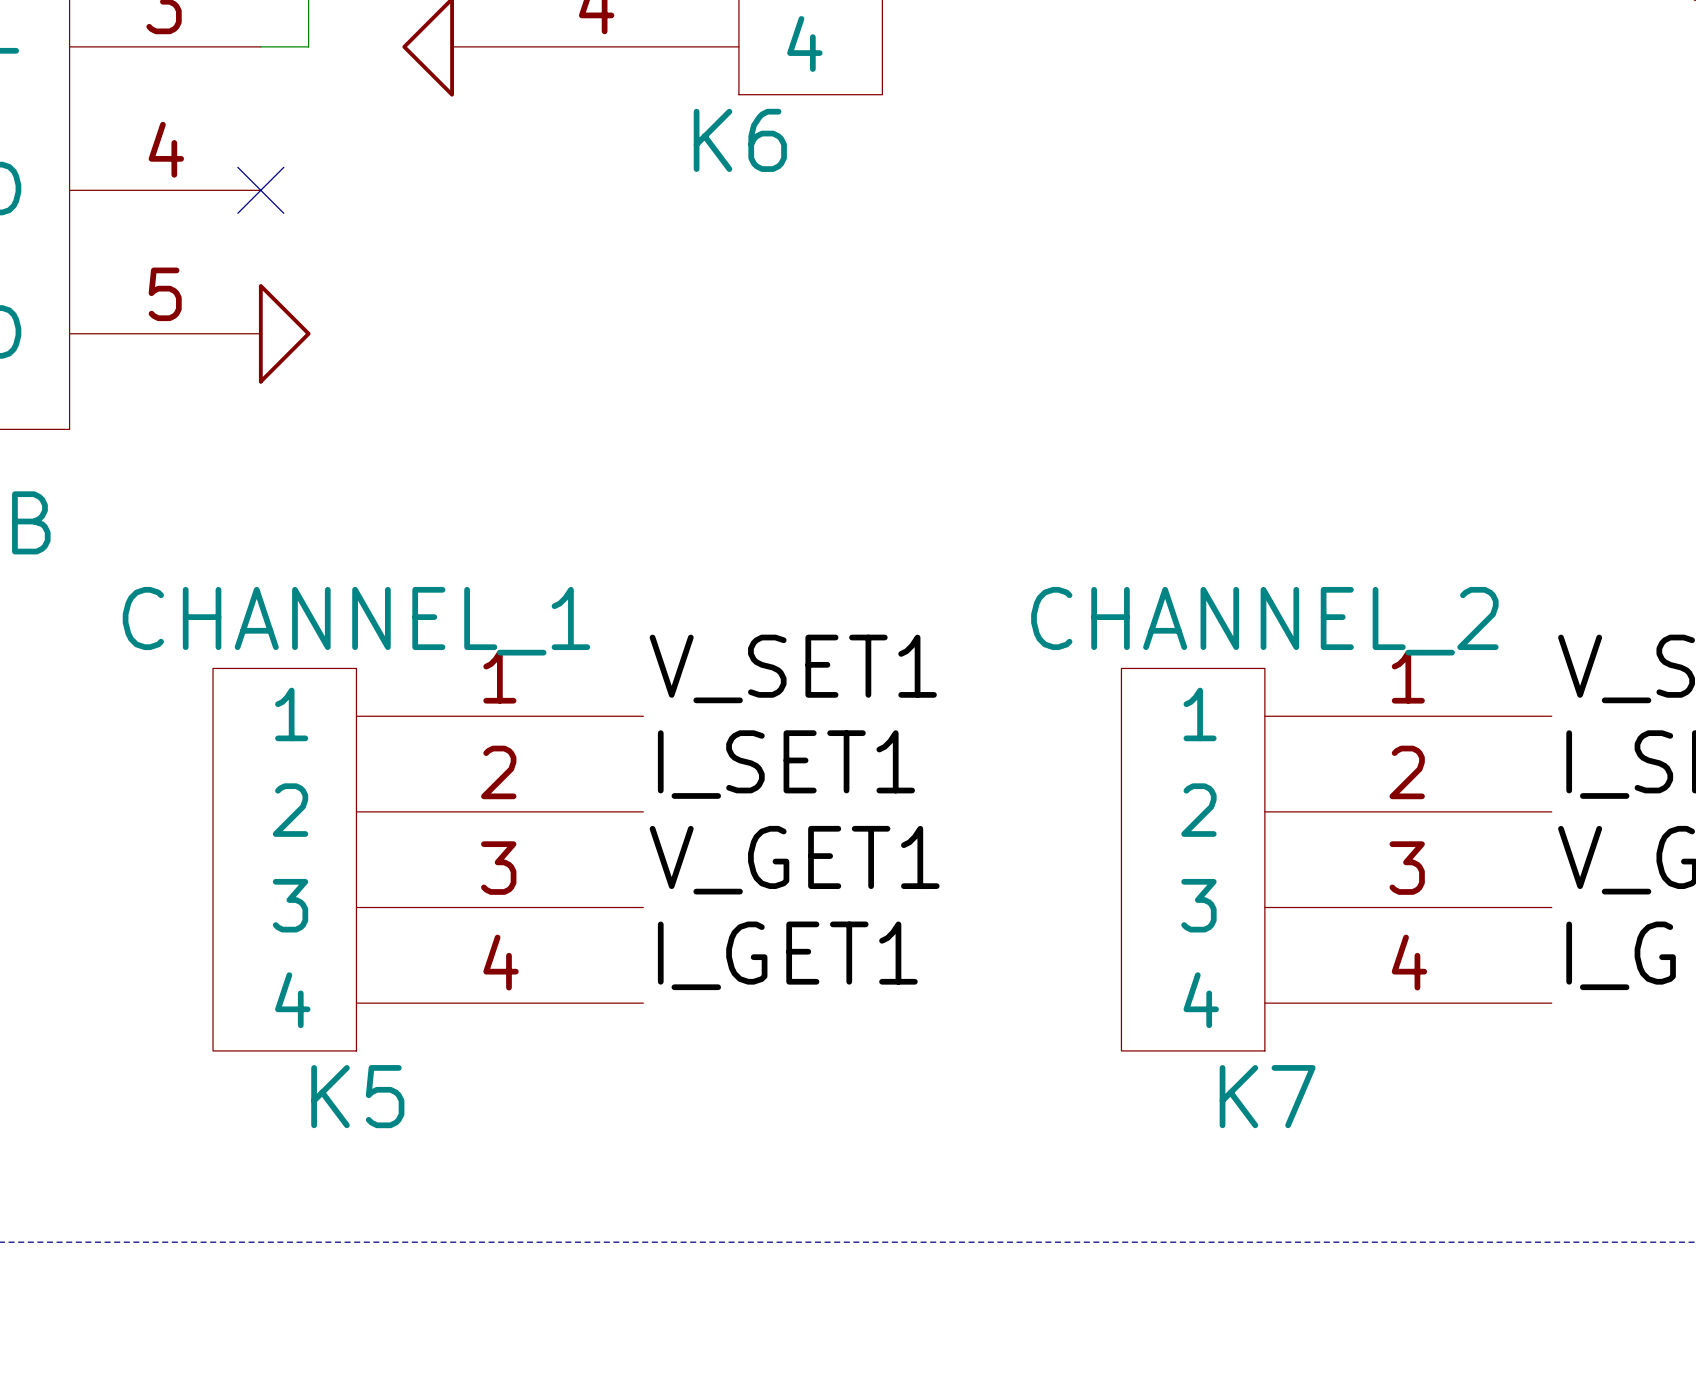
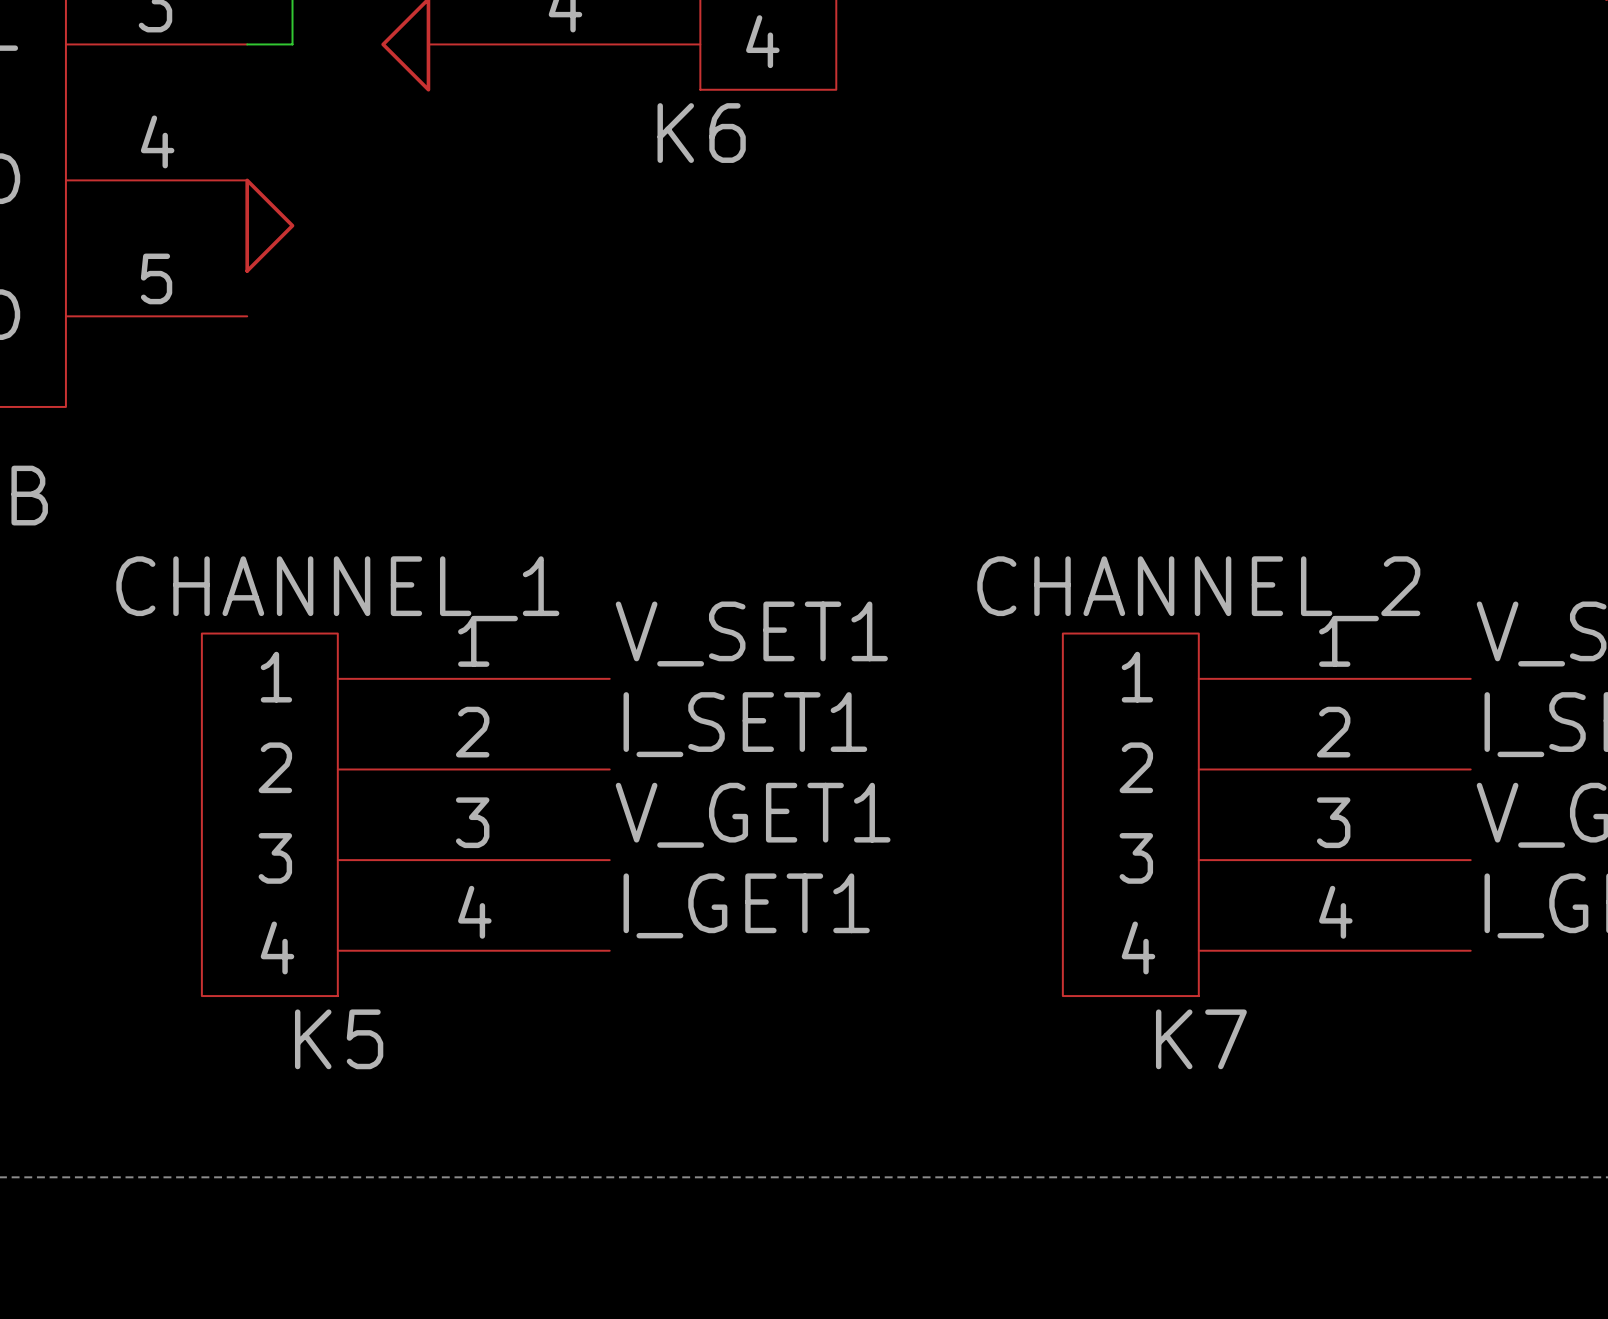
no-connect mark: (260, 190) -> none
power symbol position: (284, 333) -> (269, 225)

